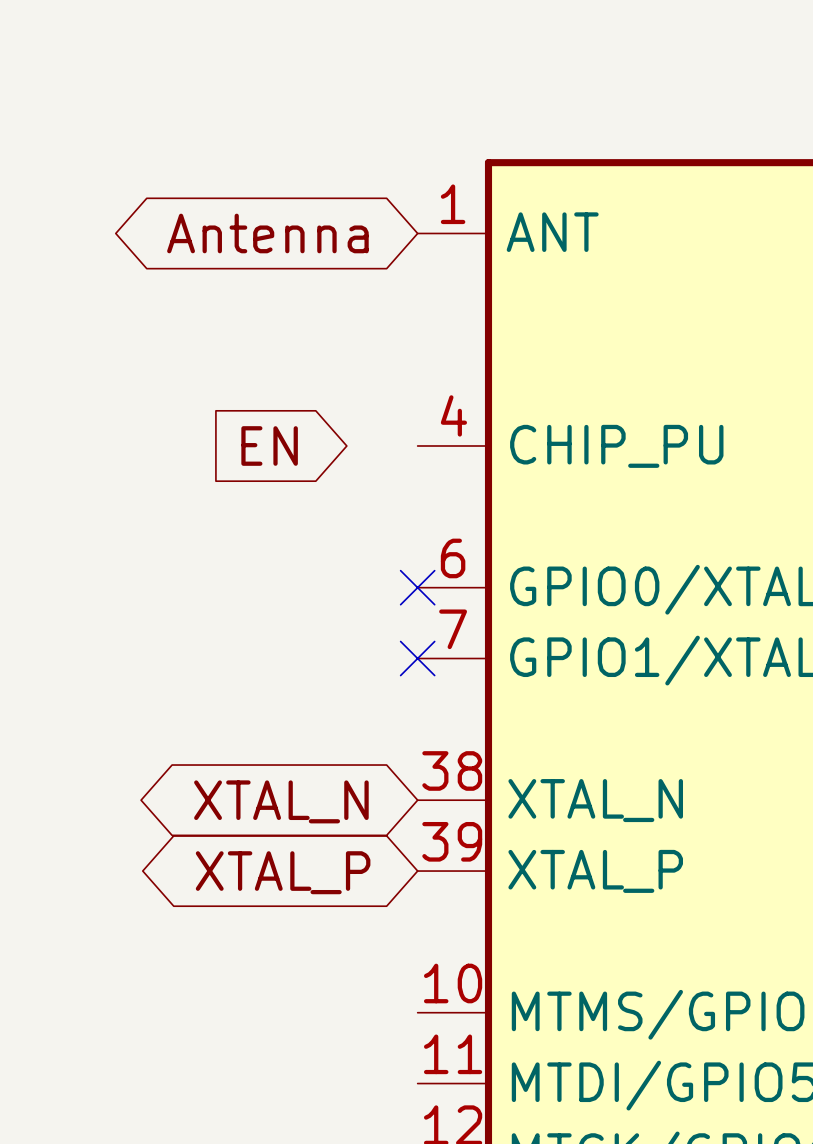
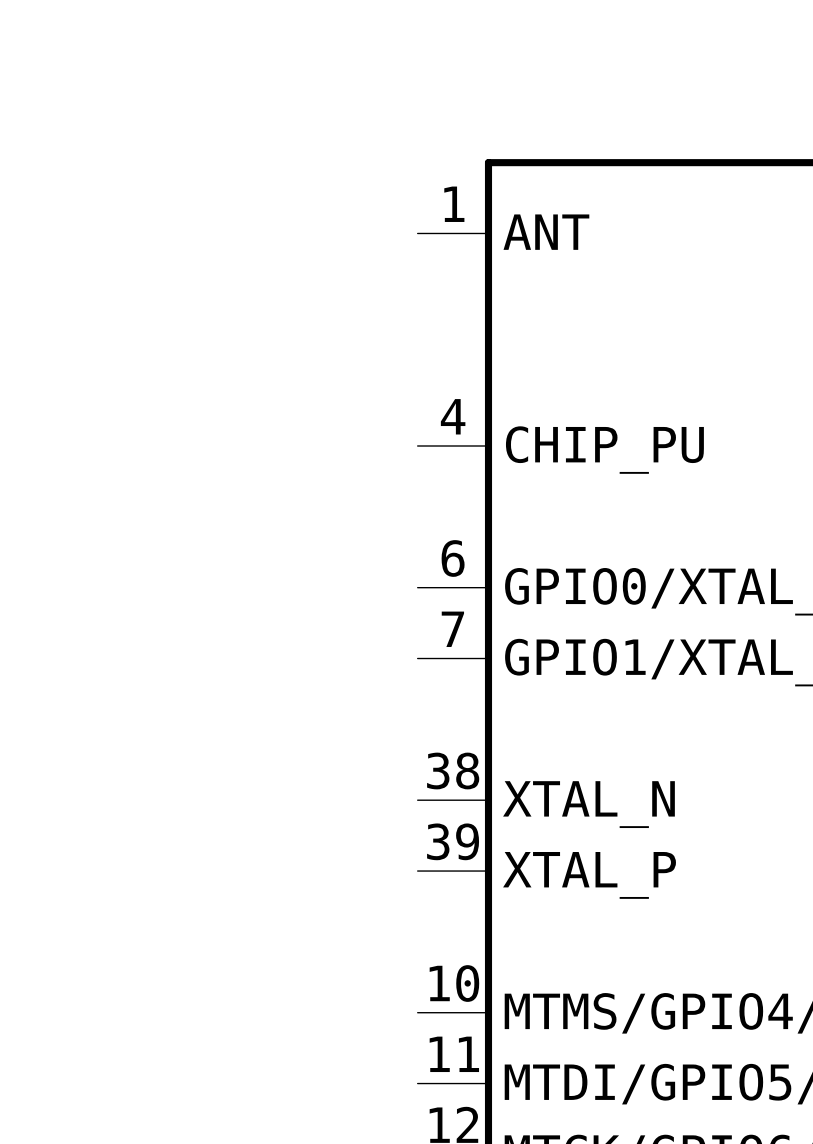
global label: Antenna (267, 233) -> none
global label: EN (269, 446) -> none
no-connect mark: (417, 587) -> none
no-connect mark: (417, 658) -> none
global label: XTAL_N (281, 801) -> none
global label: XTAL_P (283, 872) -> none

